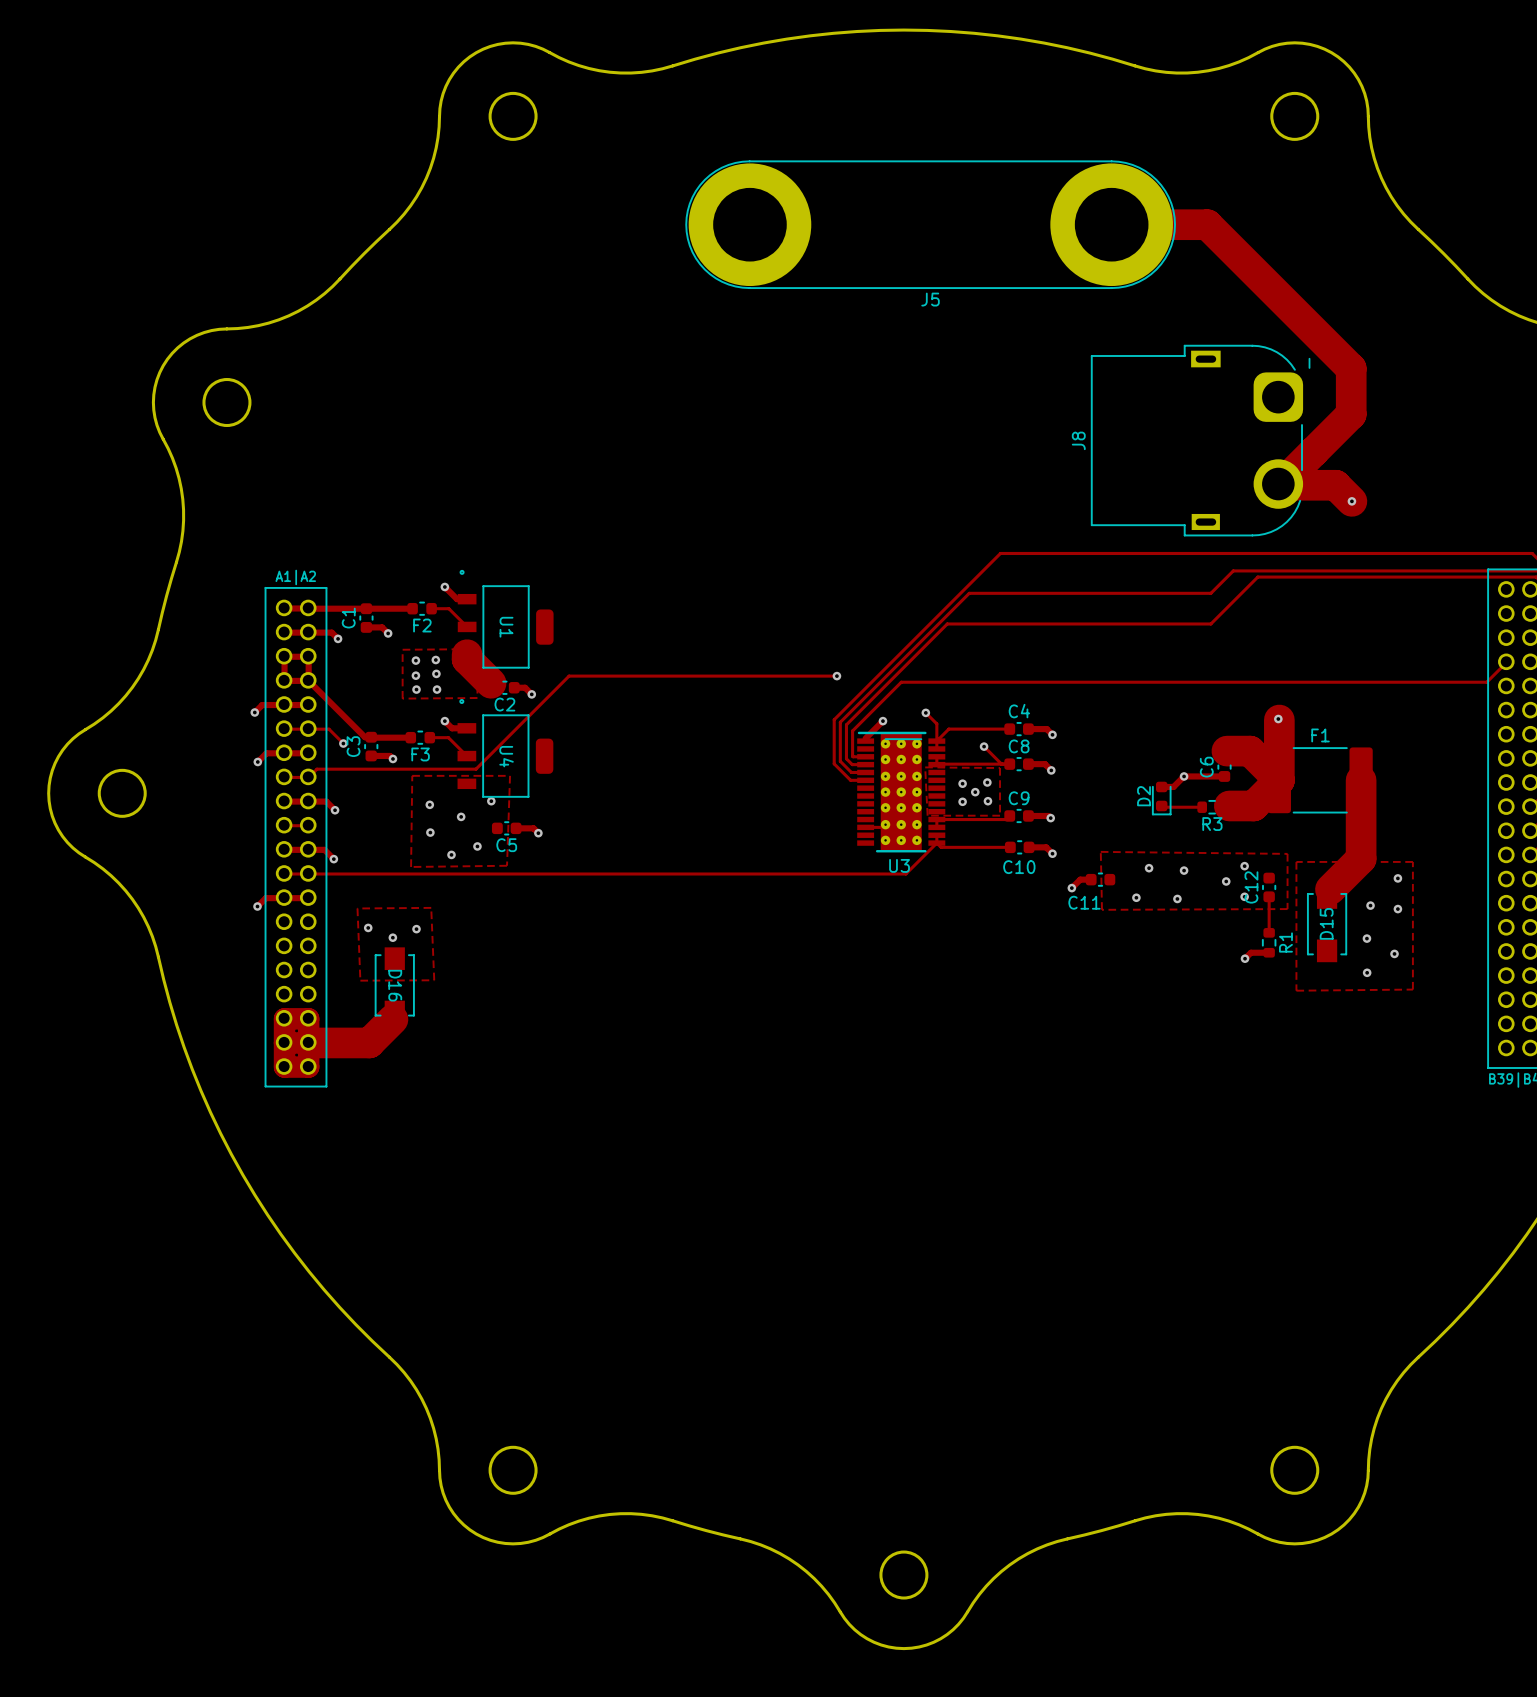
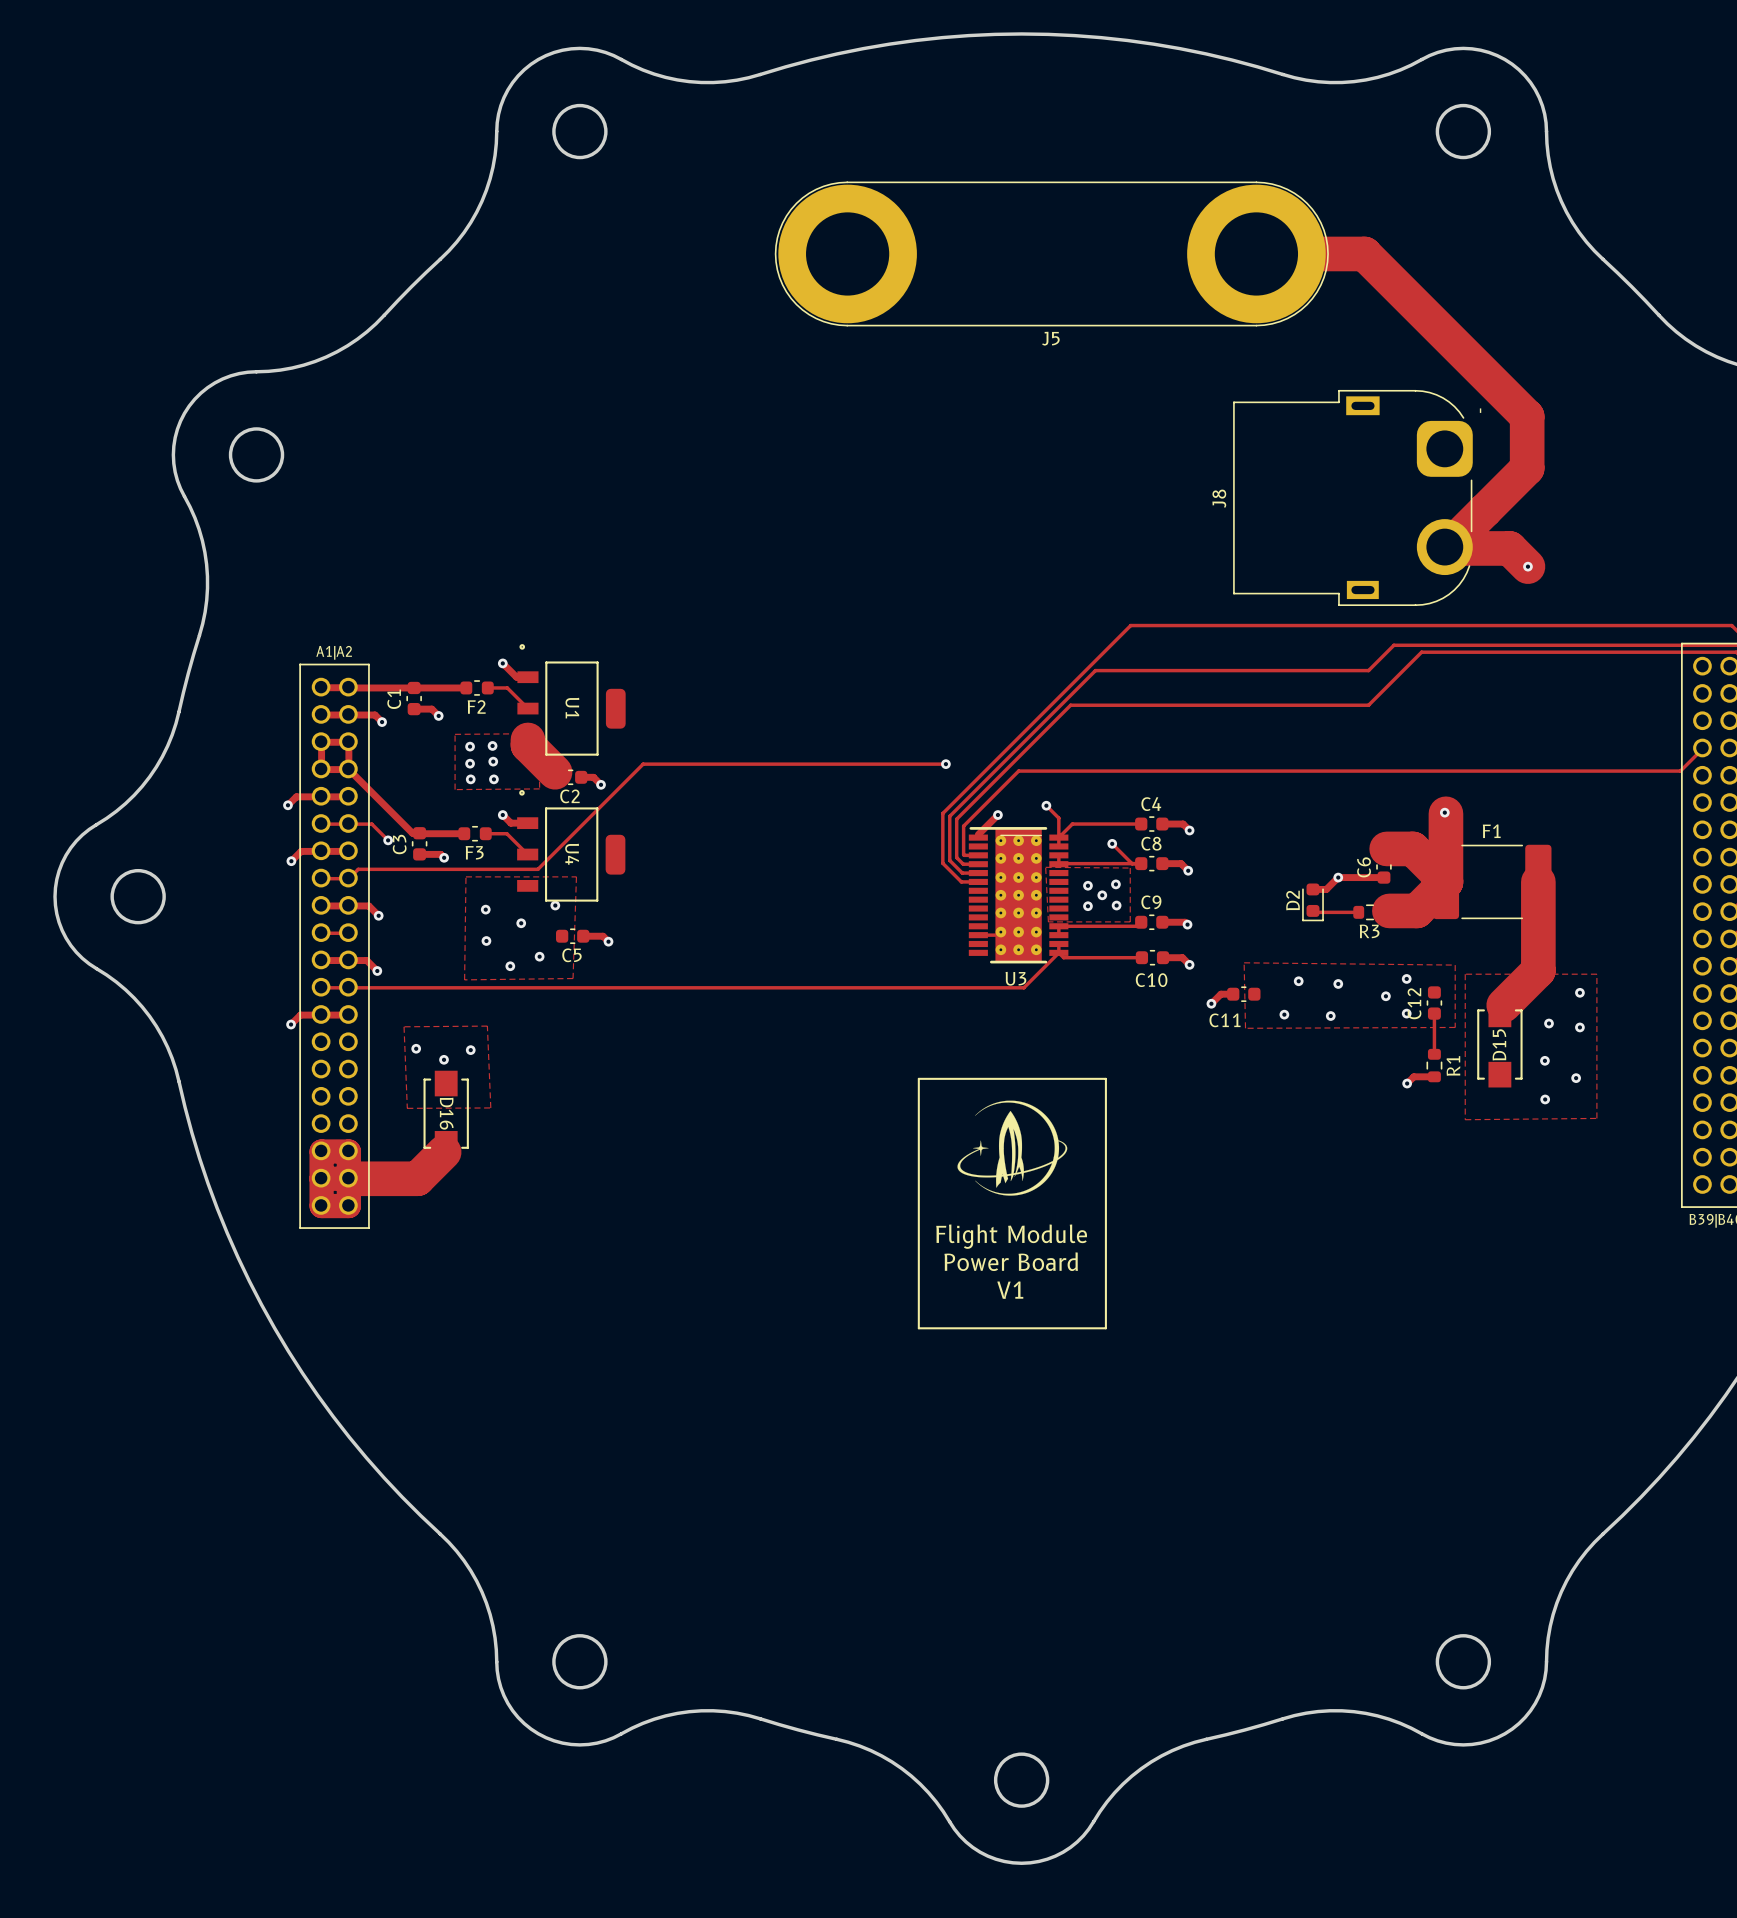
line: none -> (918, 1078) (1105, 1078) (1105, 1328) (918, 1328) (918, 1078)
drawing: none -> [957, 1100, 1068, 1196]
text: none -> Flight Module (1011, 1236)
text: none -> Power Board (1011, 1261)
text: none -> V1 (1010, 1290)

